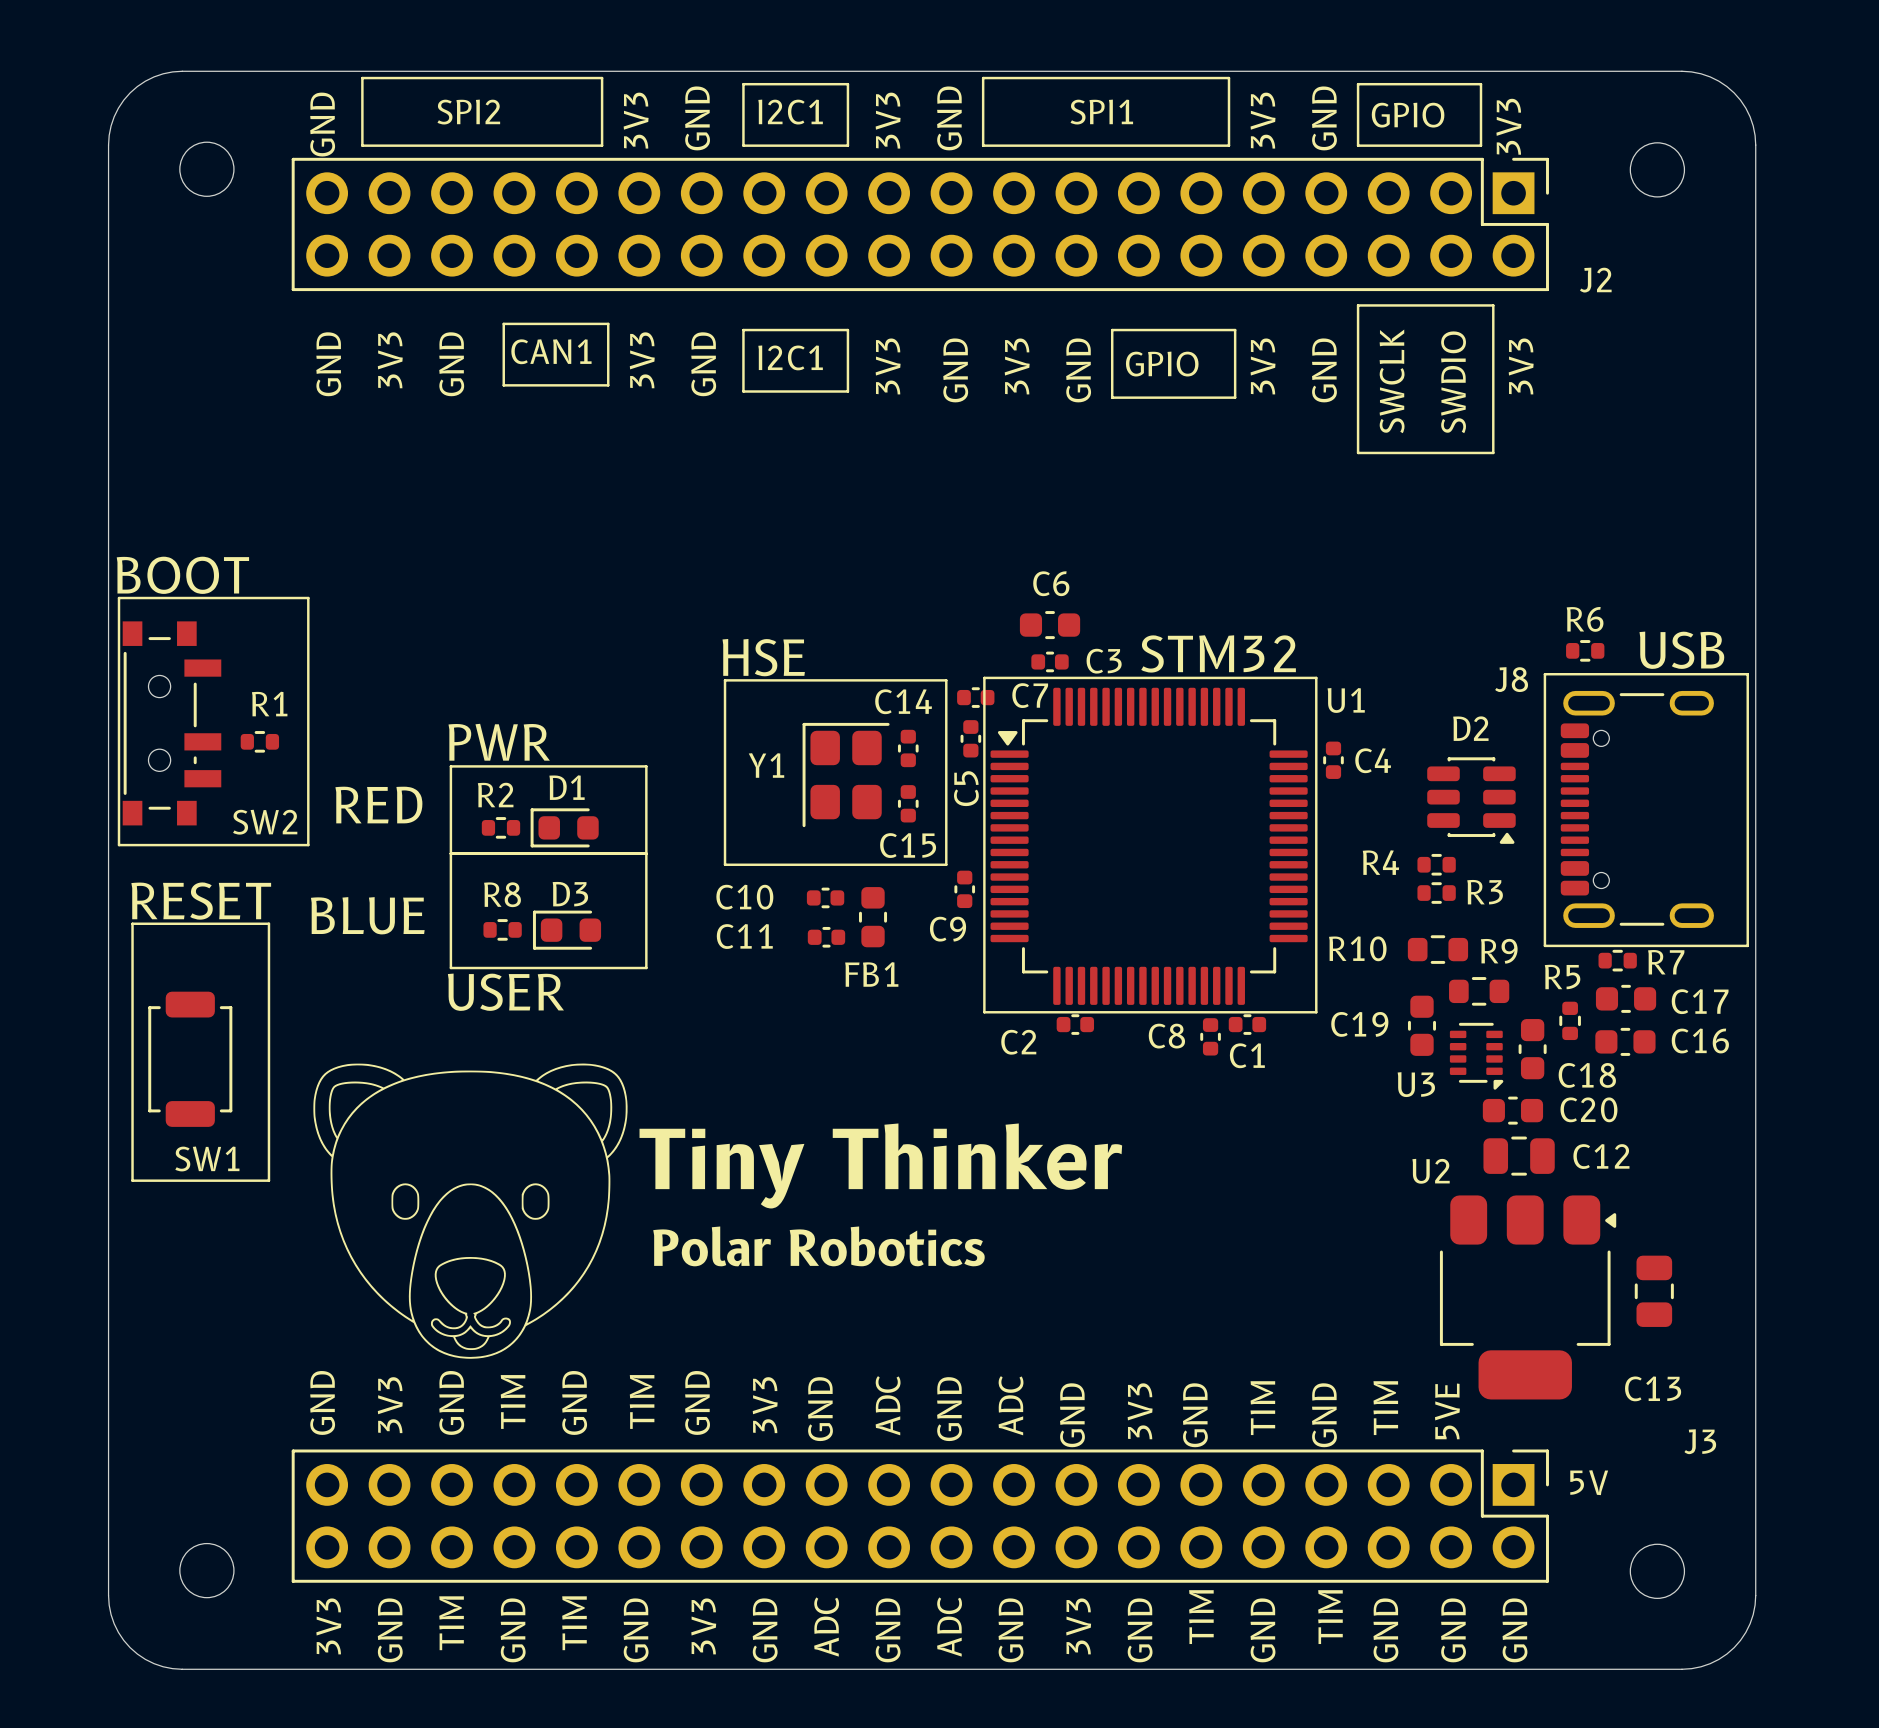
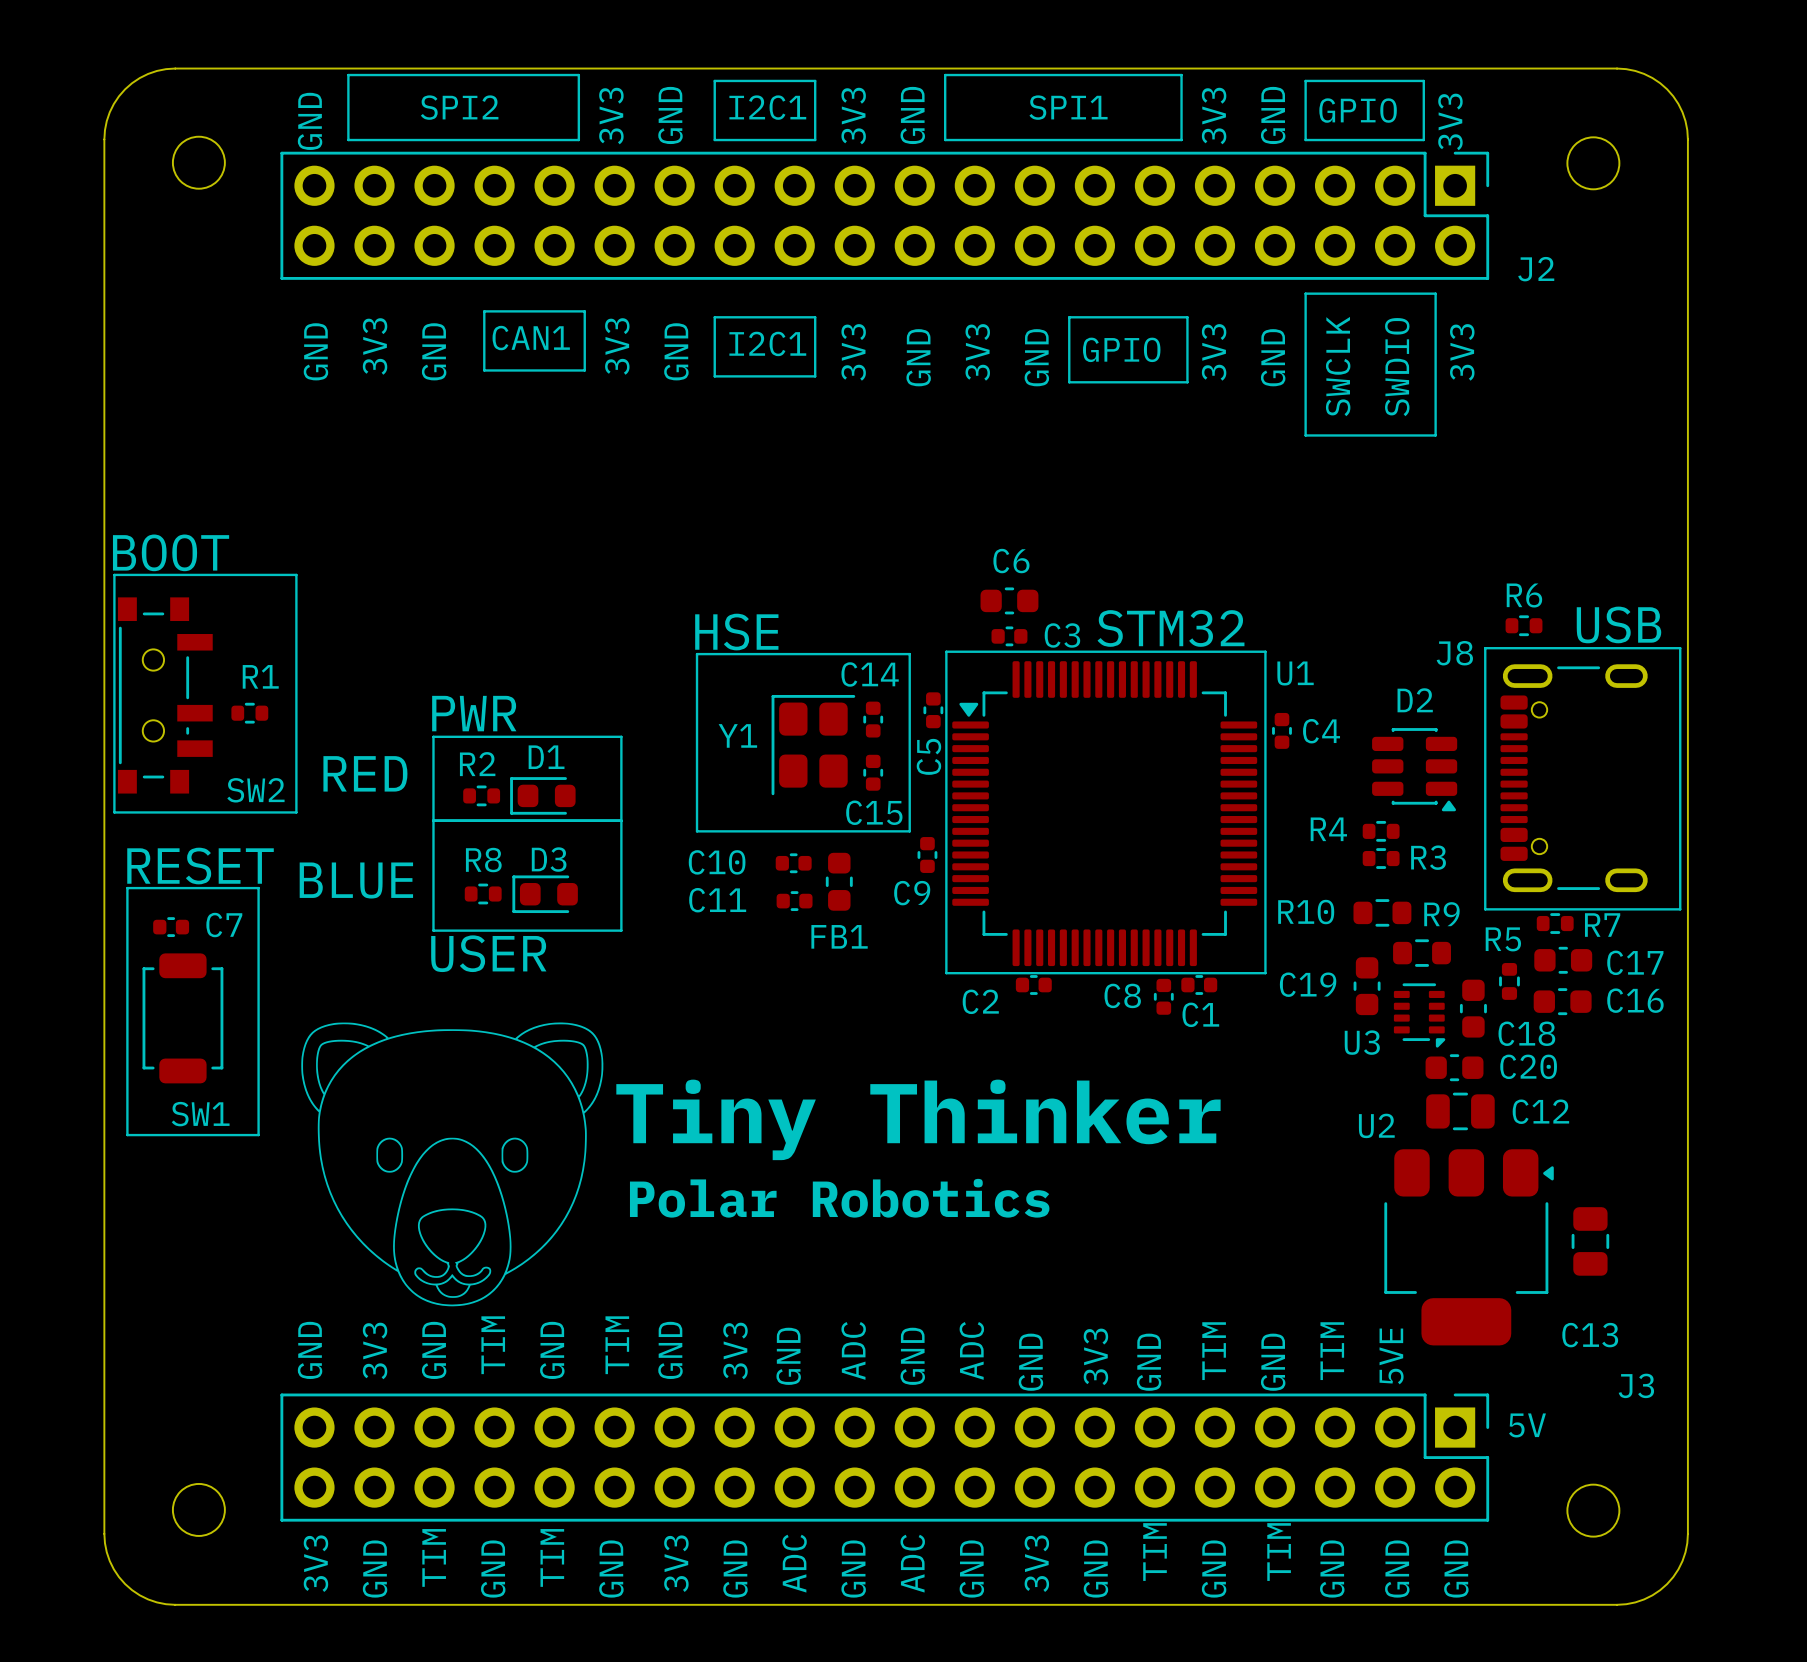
C7 position: (975, 697) -> (171, 927)

